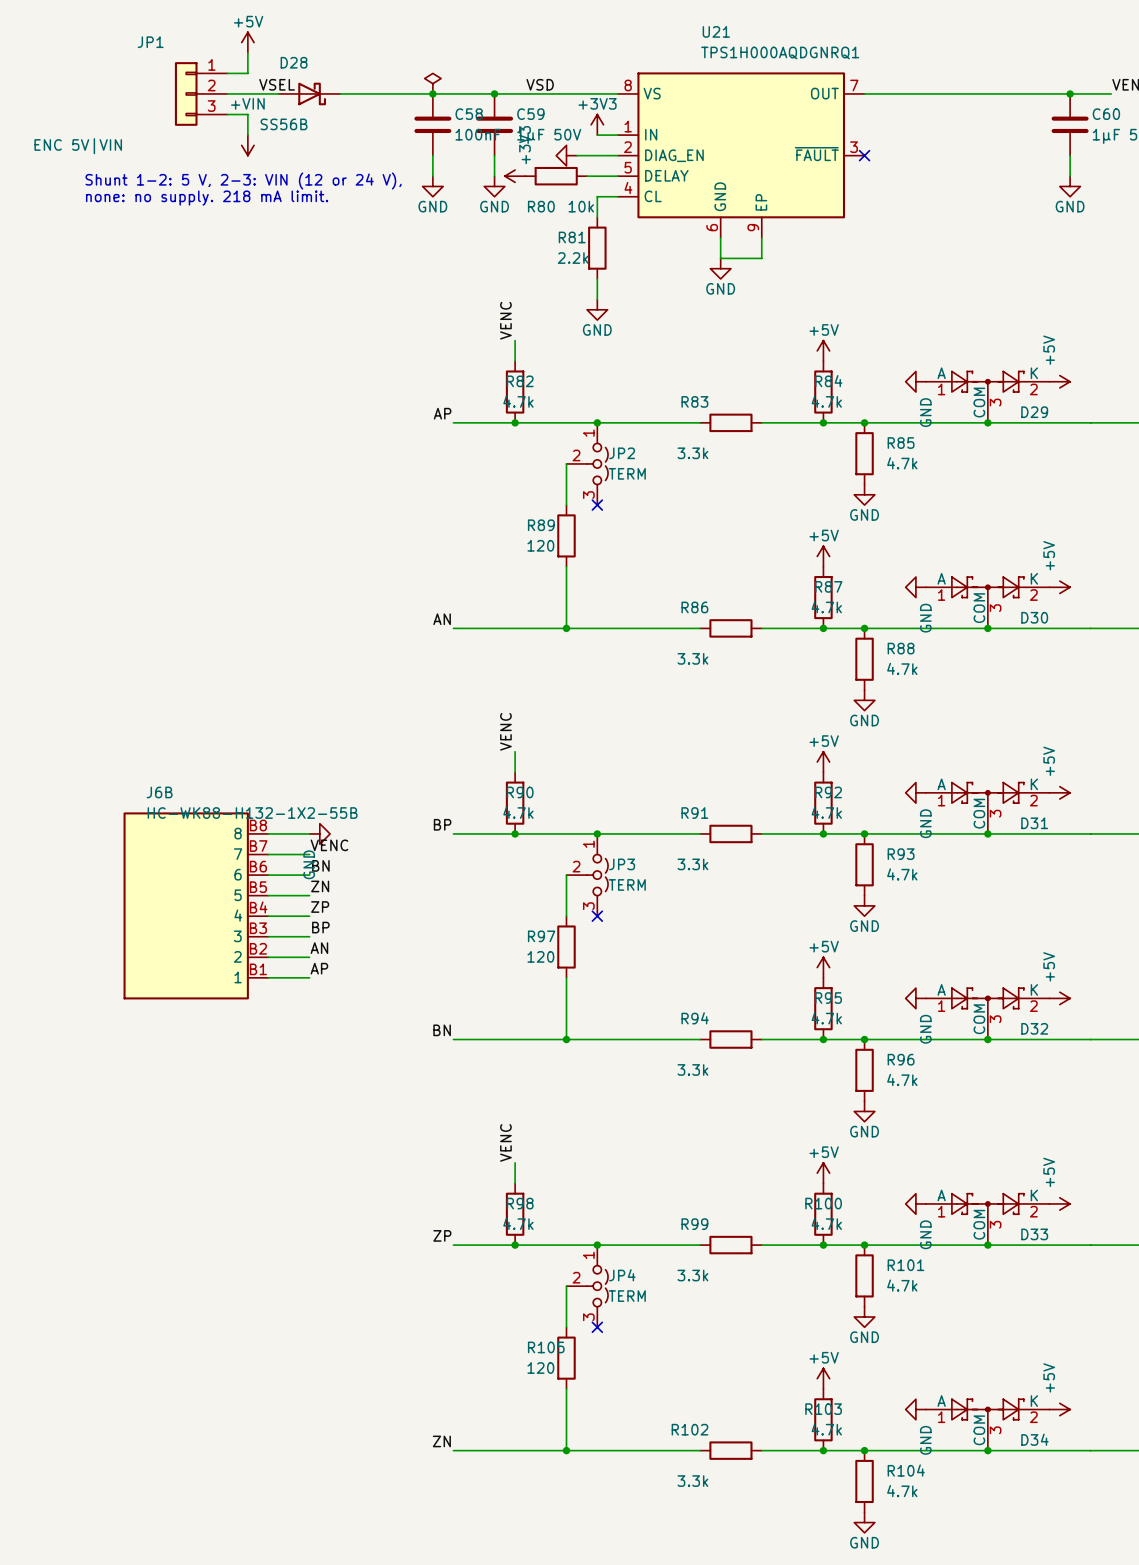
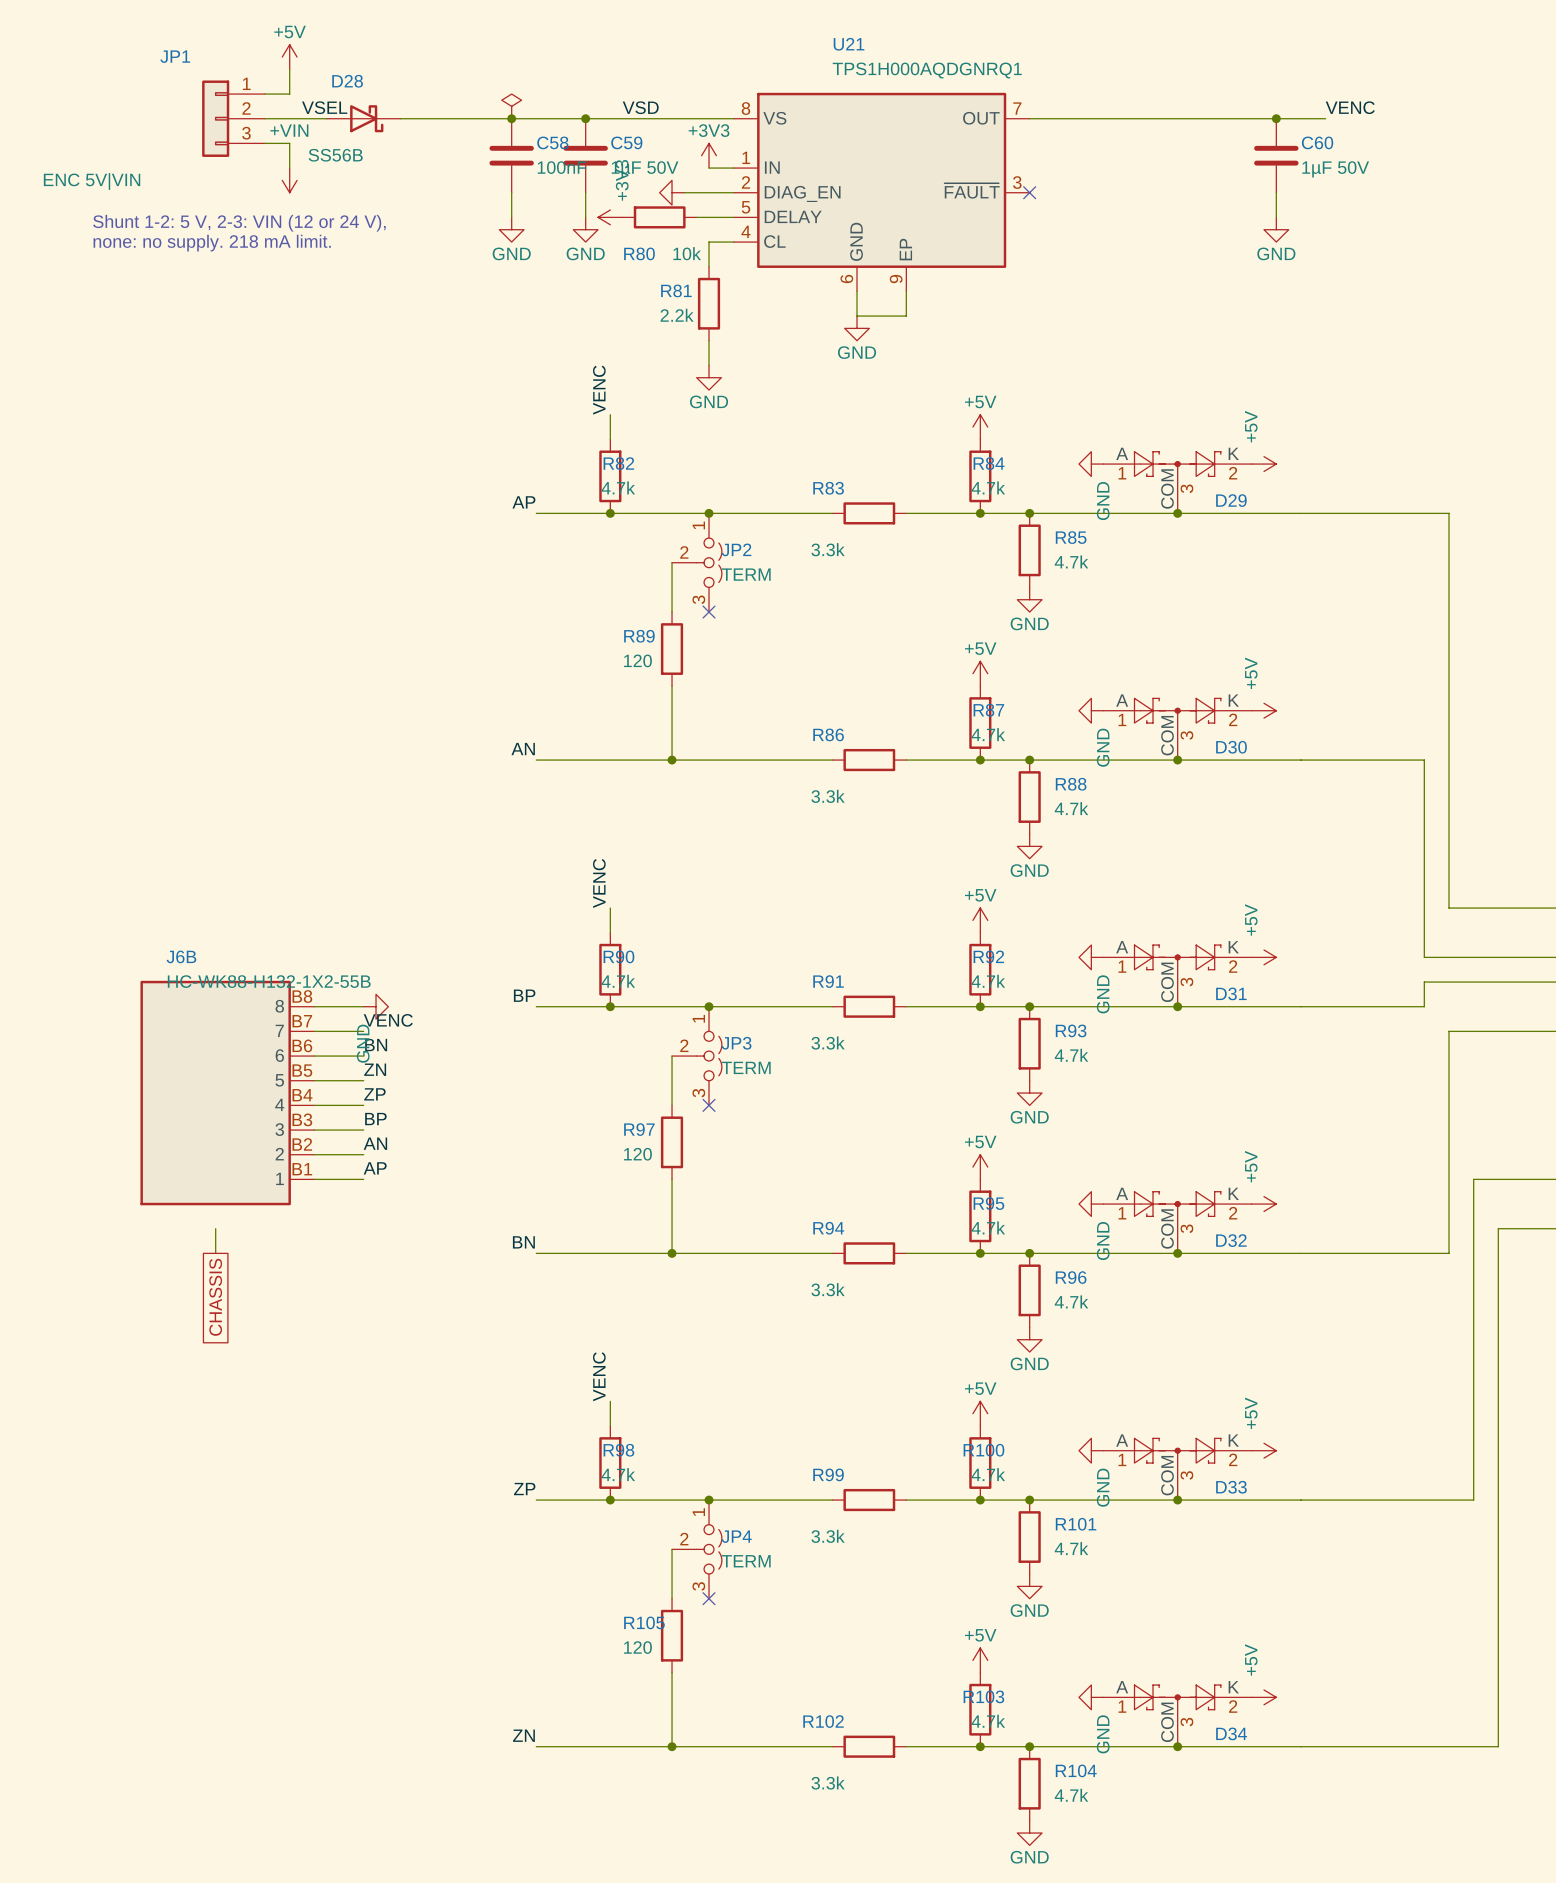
wire: none -> (215, 1228) (215, 1253)
global label: none -> CHASSIS (215, 1297)

